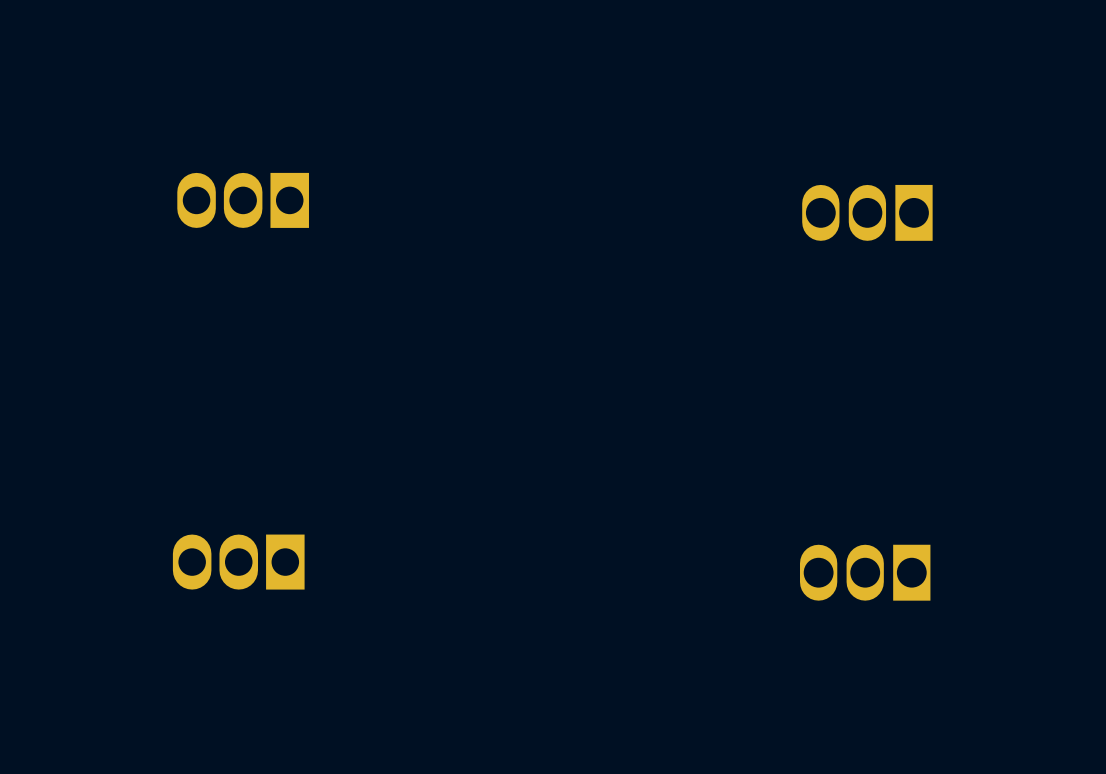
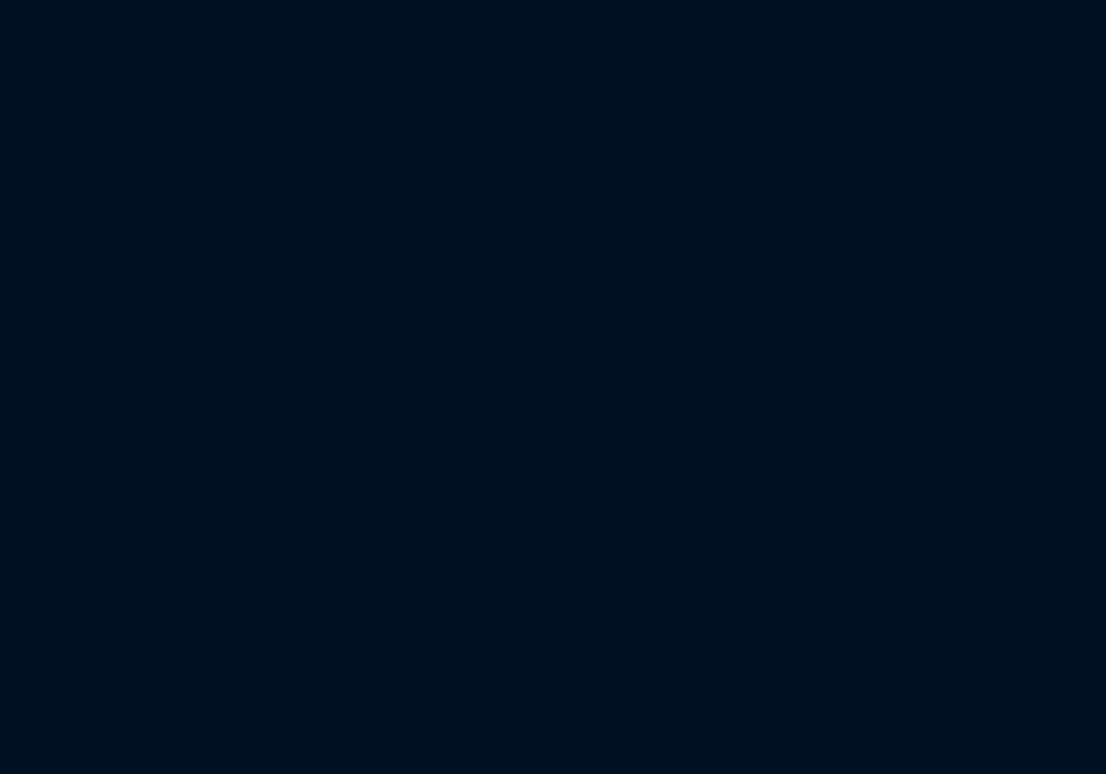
part: (243, 200) -> none
part: (867, 212) -> none
part: (238, 562) -> none
part: (865, 572) -> none

